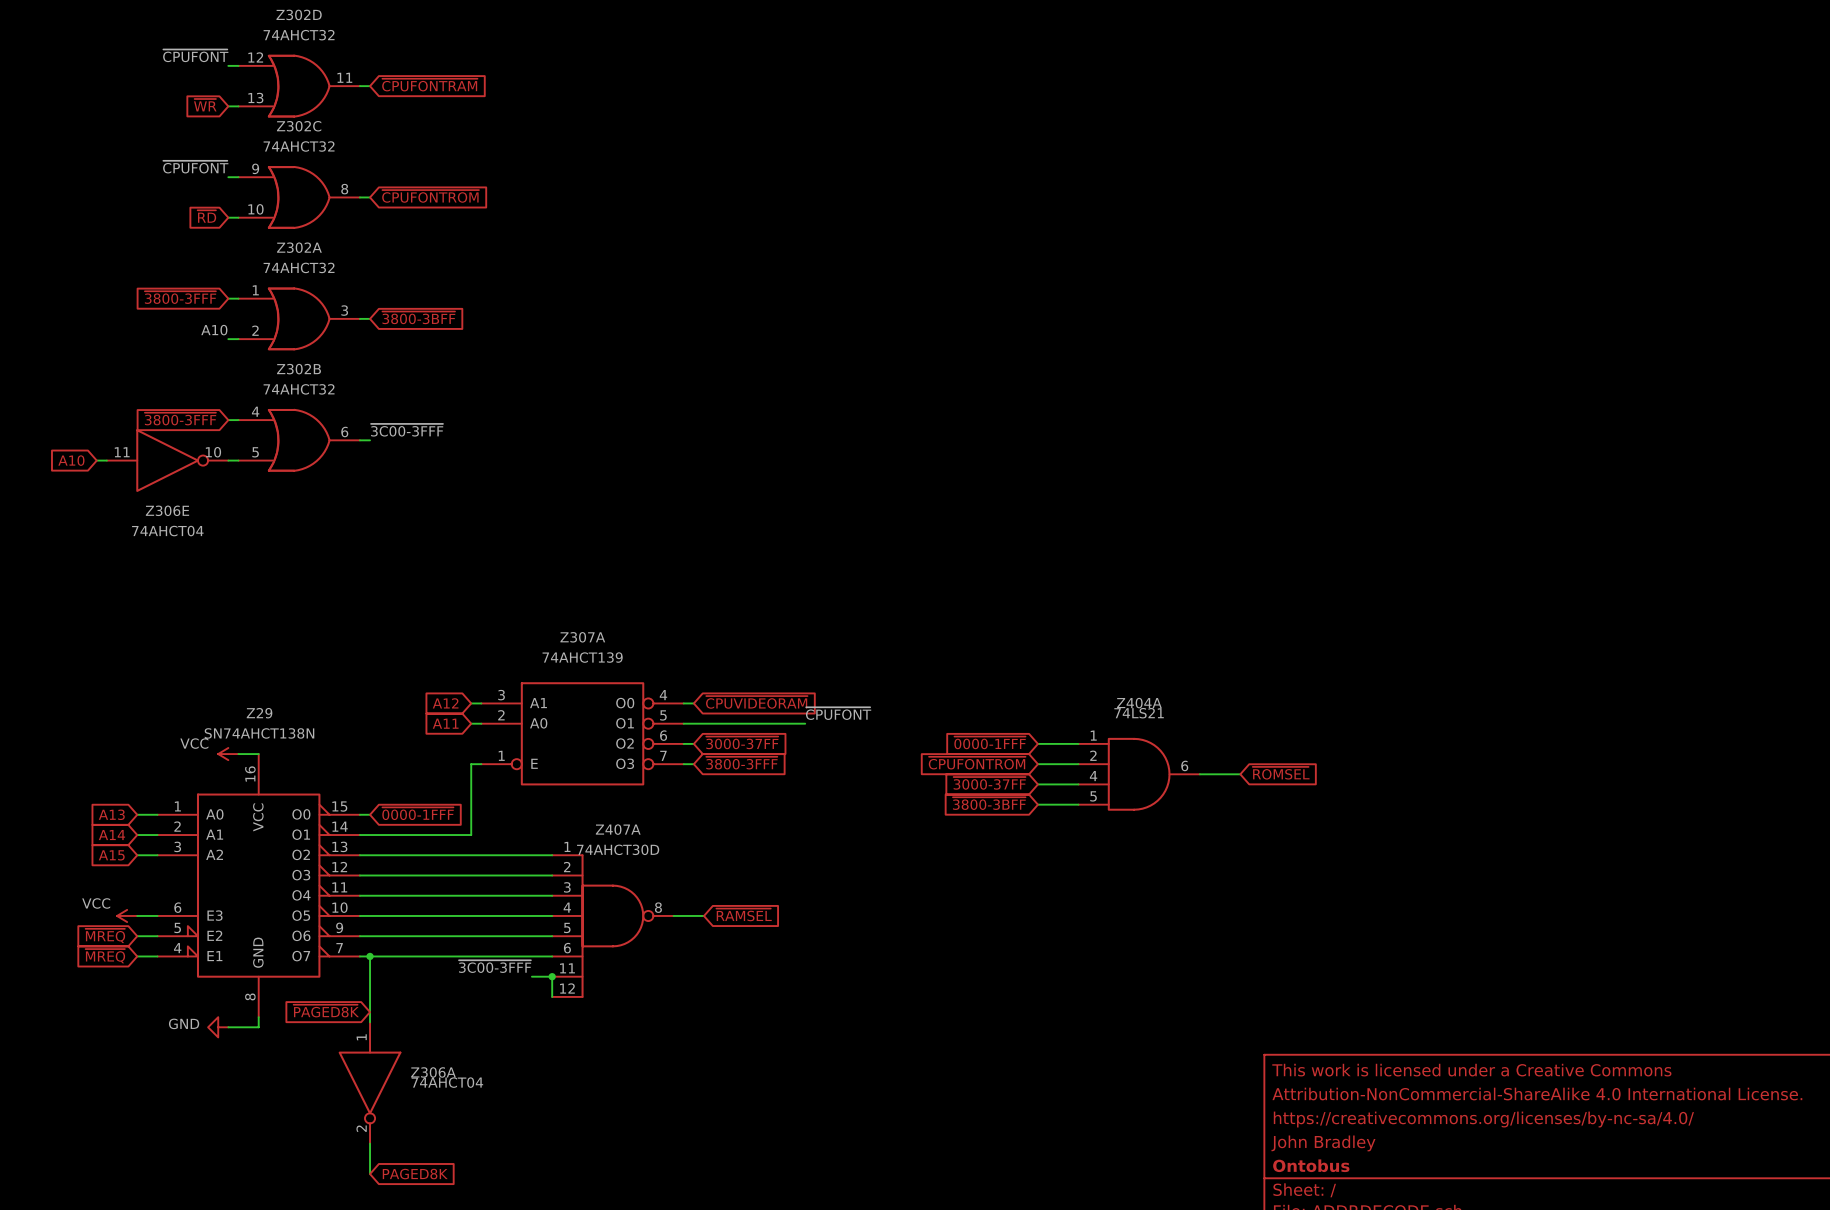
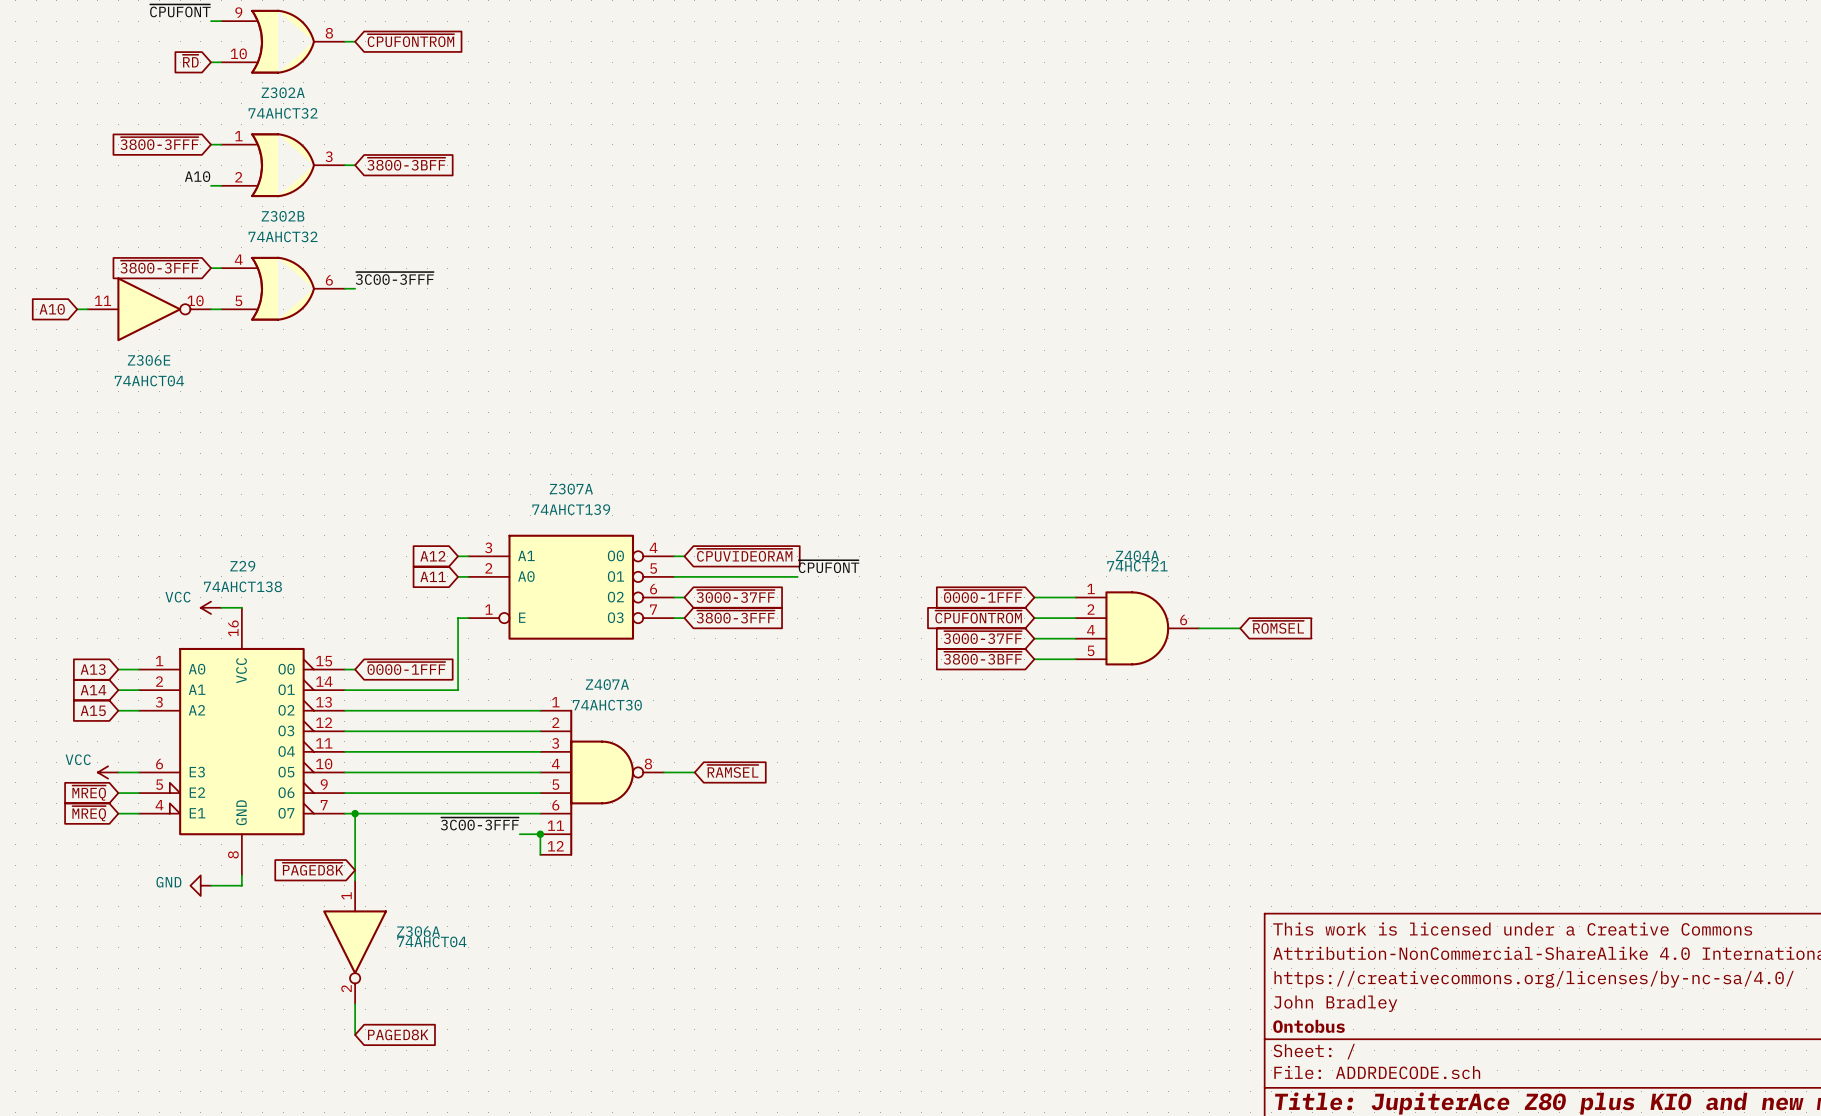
Z404A value: 74LS21 (1139, 713) -> 74HCT21 (1137, 566)
Z29 value: SN74AHCT138N (259, 733) -> 74AHCT138 (243, 586)
Z407A value: 74AHCT30D (618, 849) -> 74AHCT30 (607, 705)

